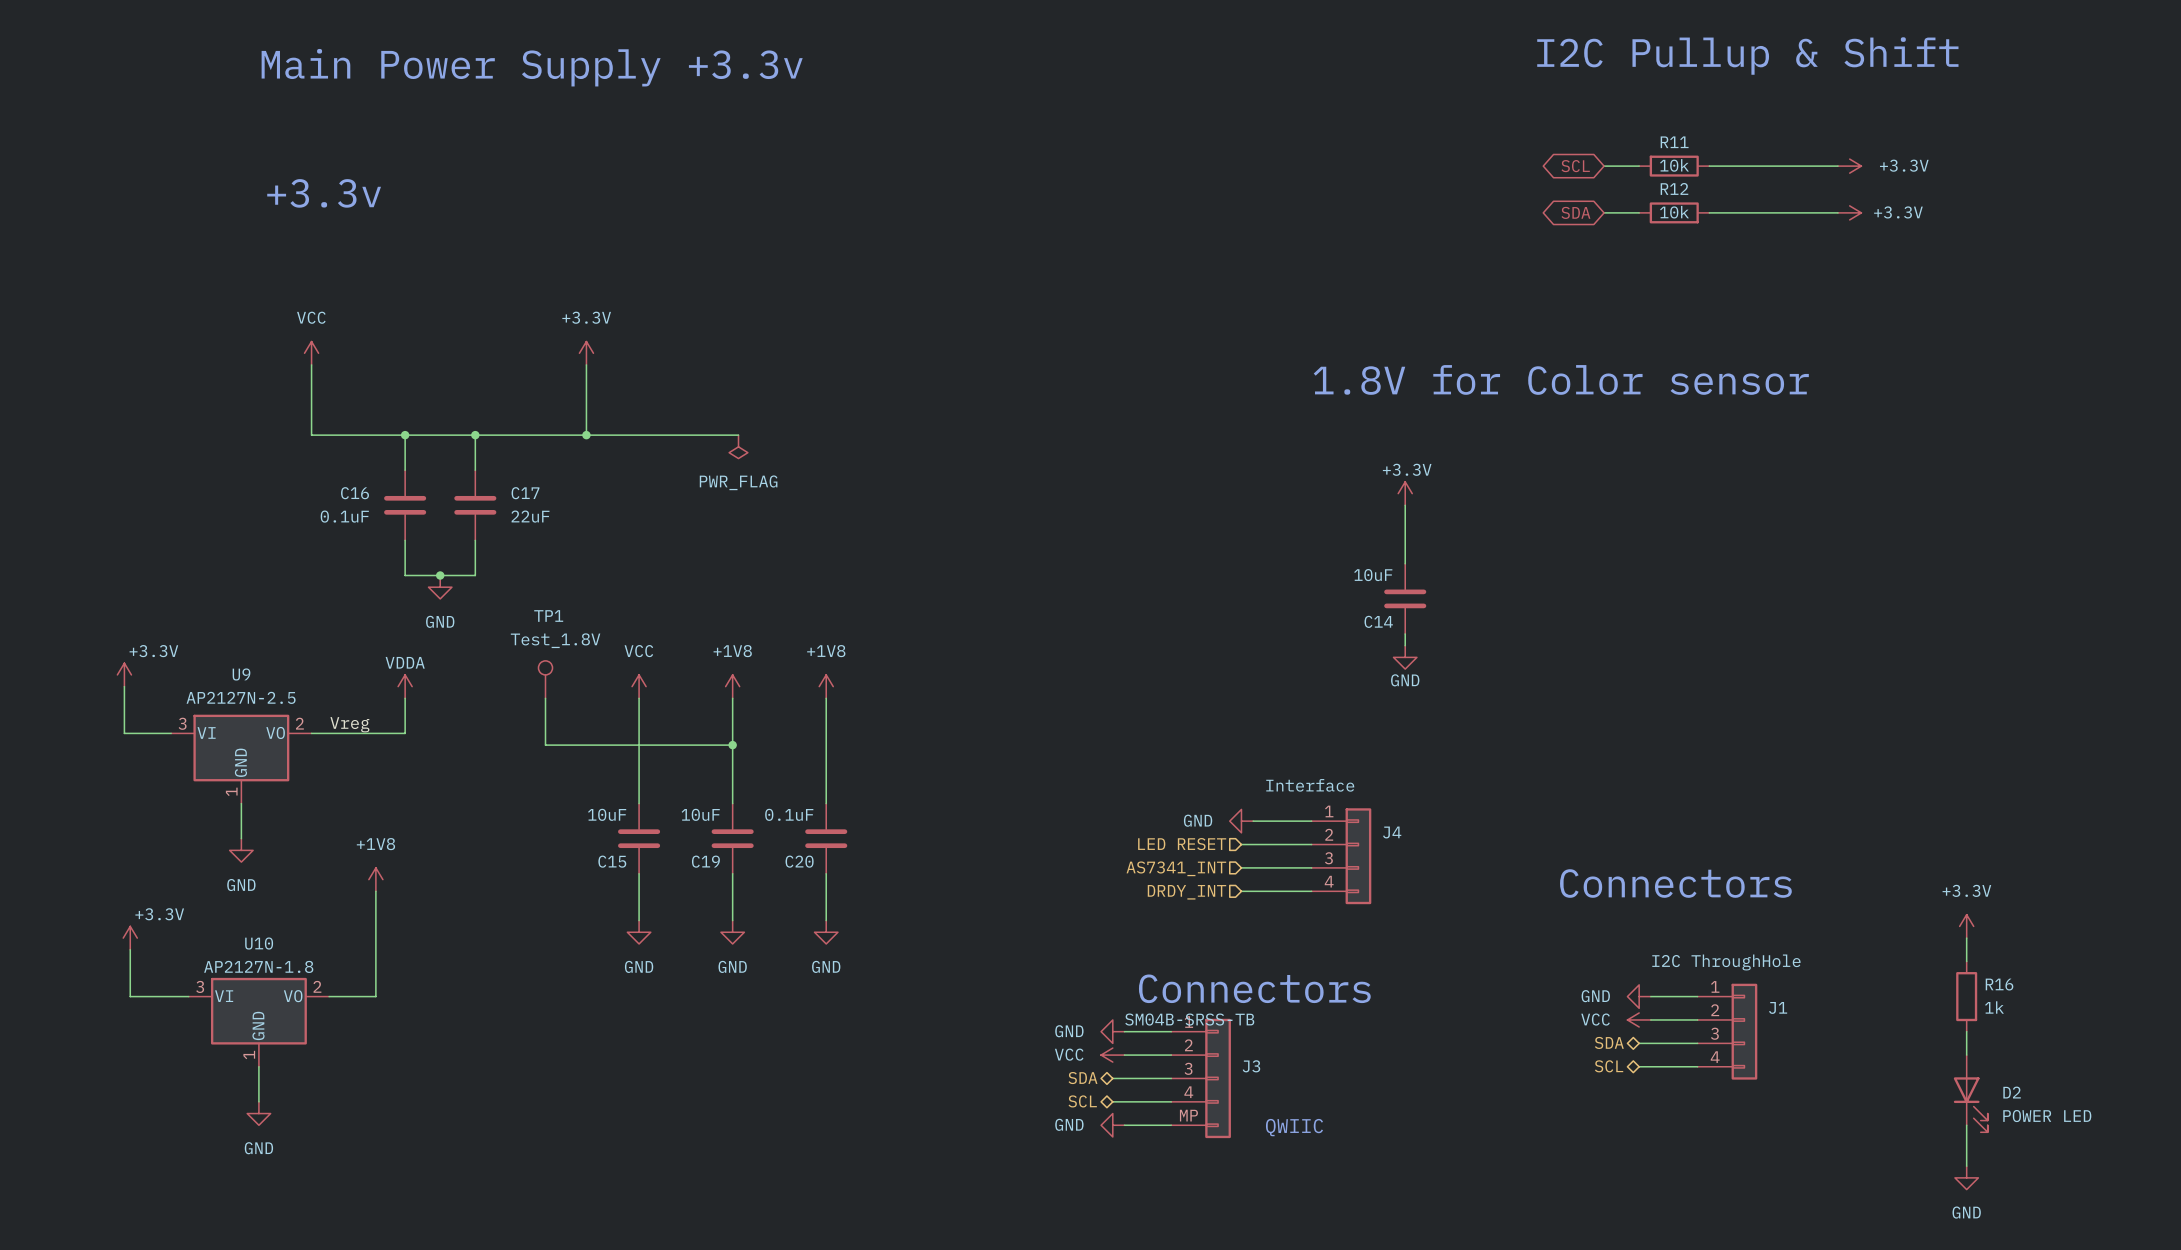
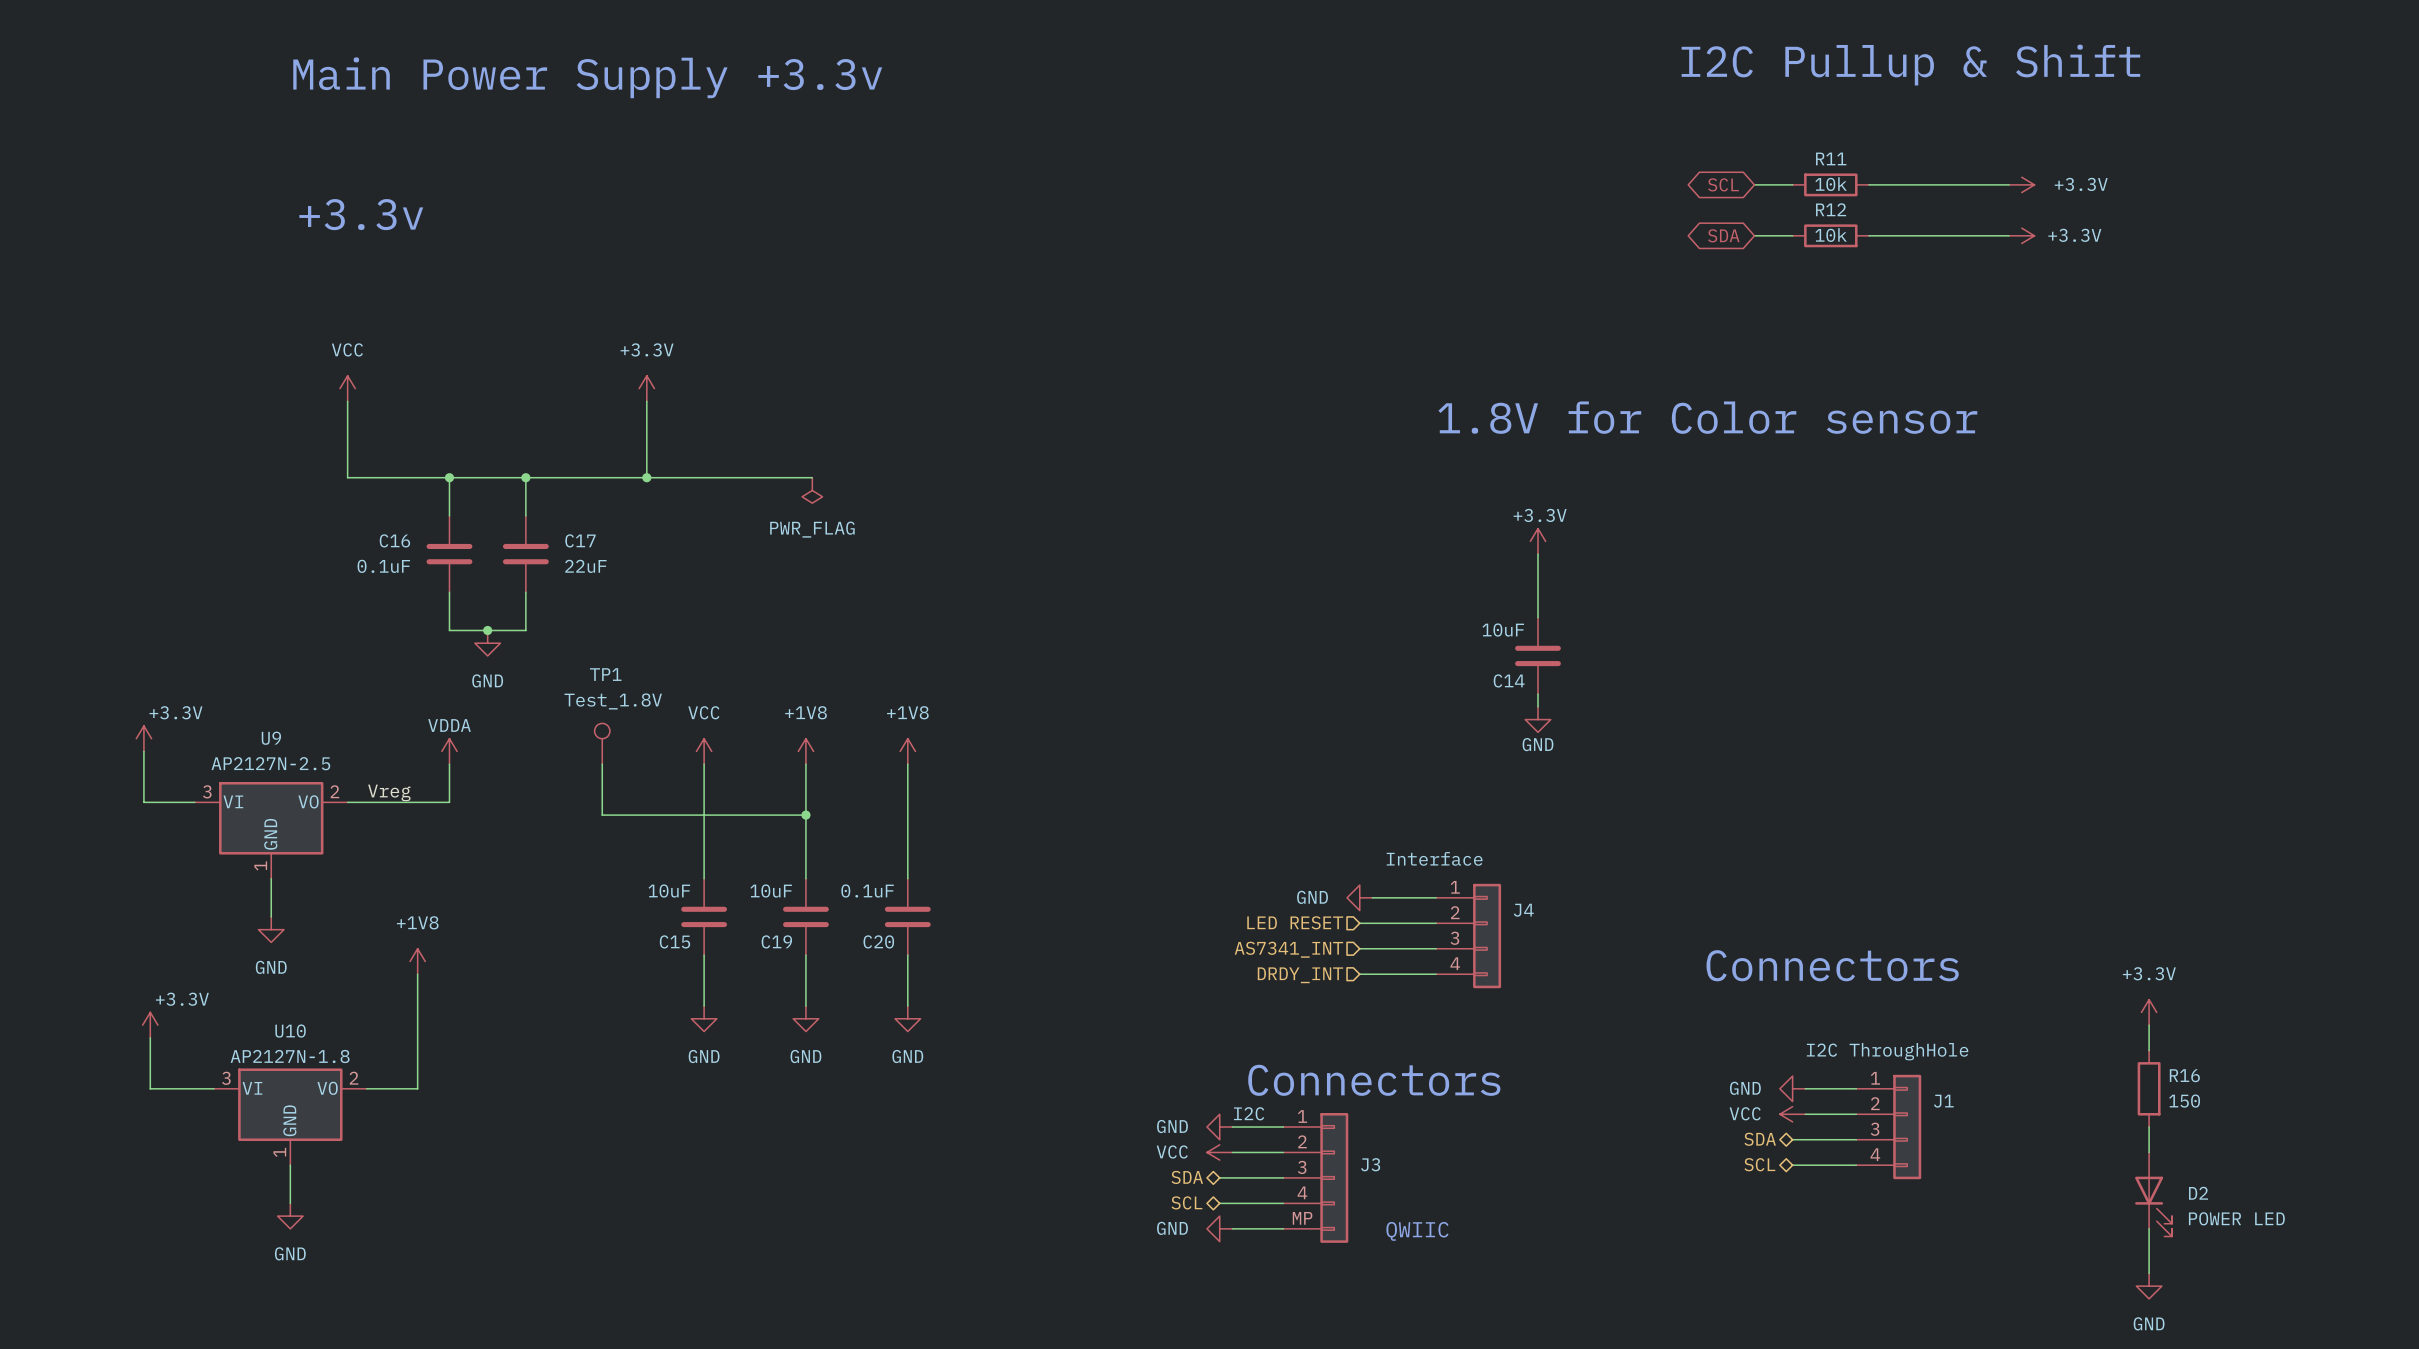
R16 value: 1k (1994, 1007) -> 150 (2184, 1101)
J3 value: SM04B-SRSS-TB (1189, 1019) -> I2C (1249, 1113)

